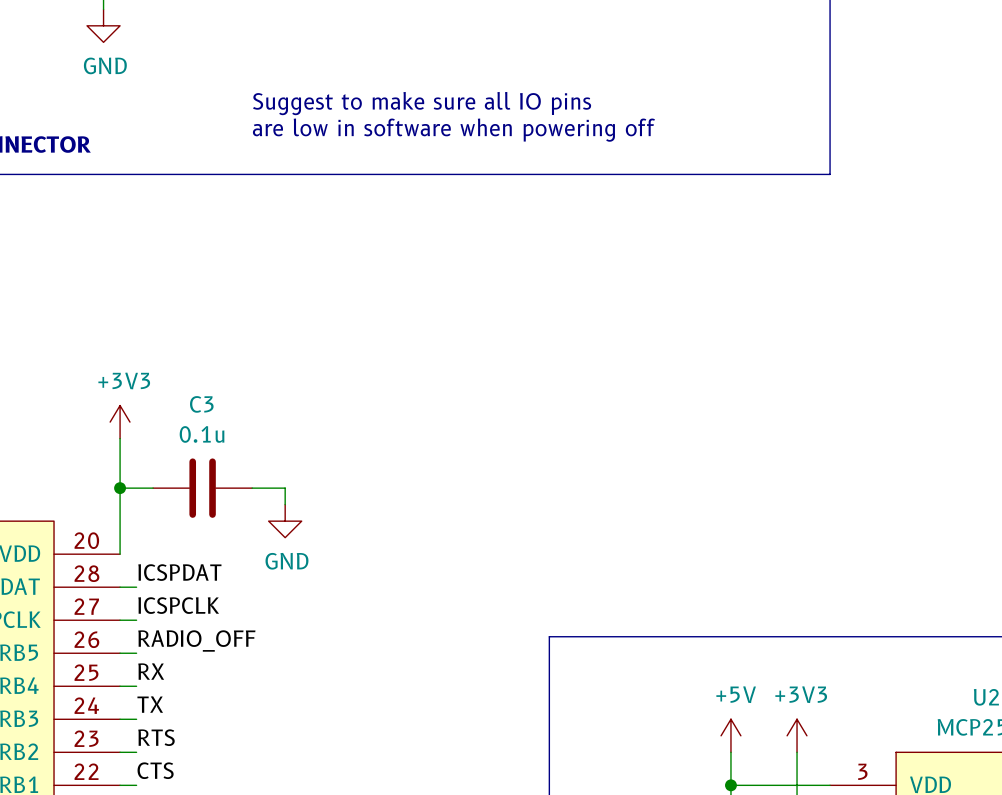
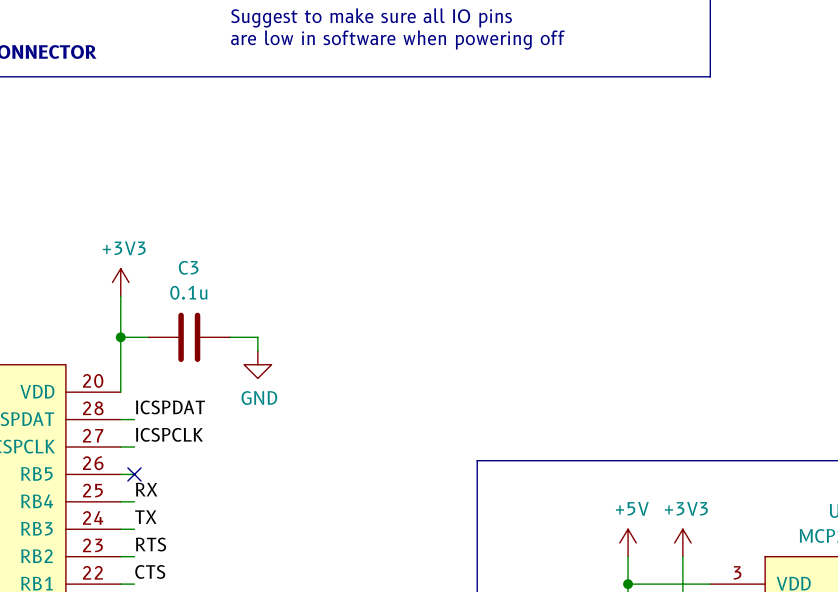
label: RADIO_OFF (196, 640) -> none
no-connect mark: none -> (134, 474)

